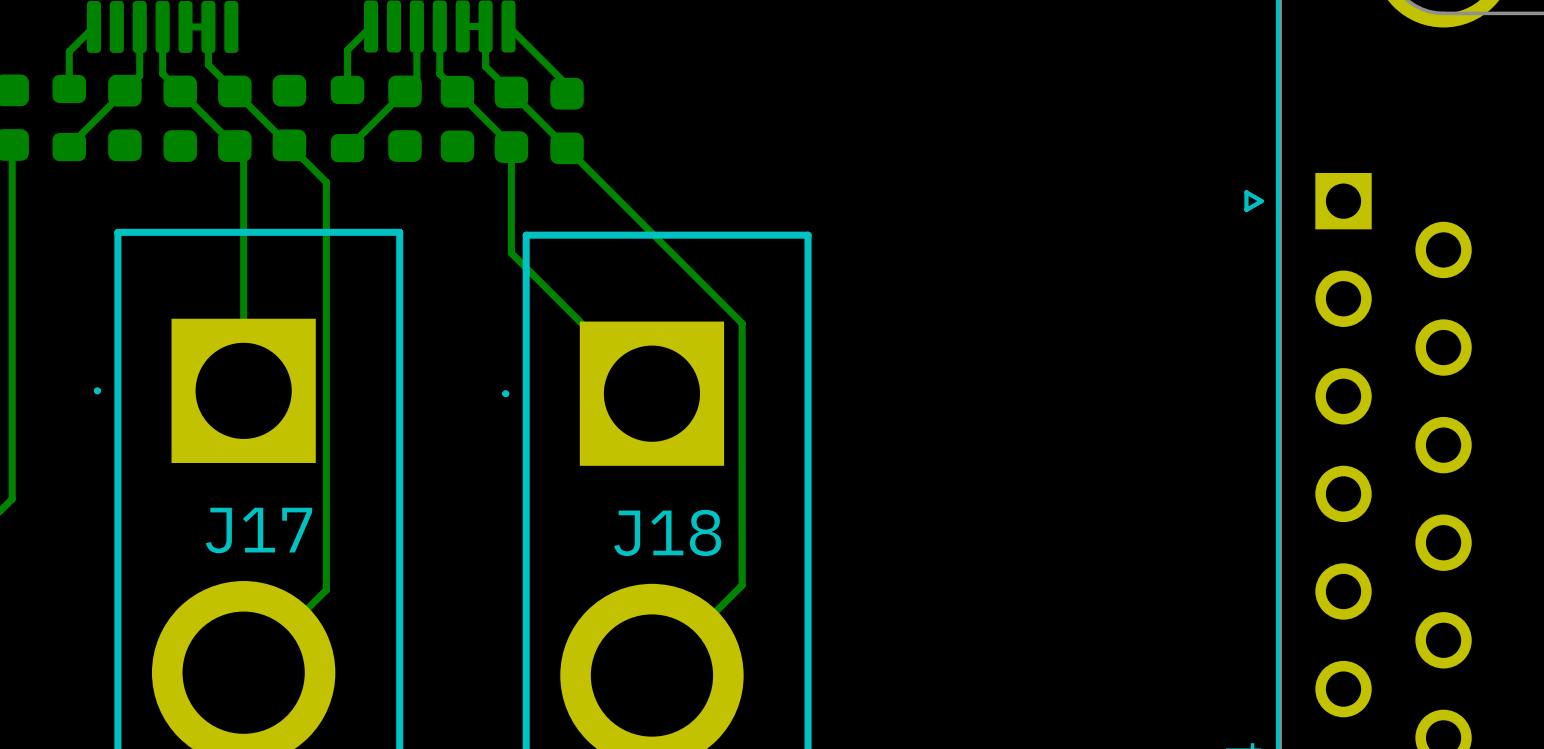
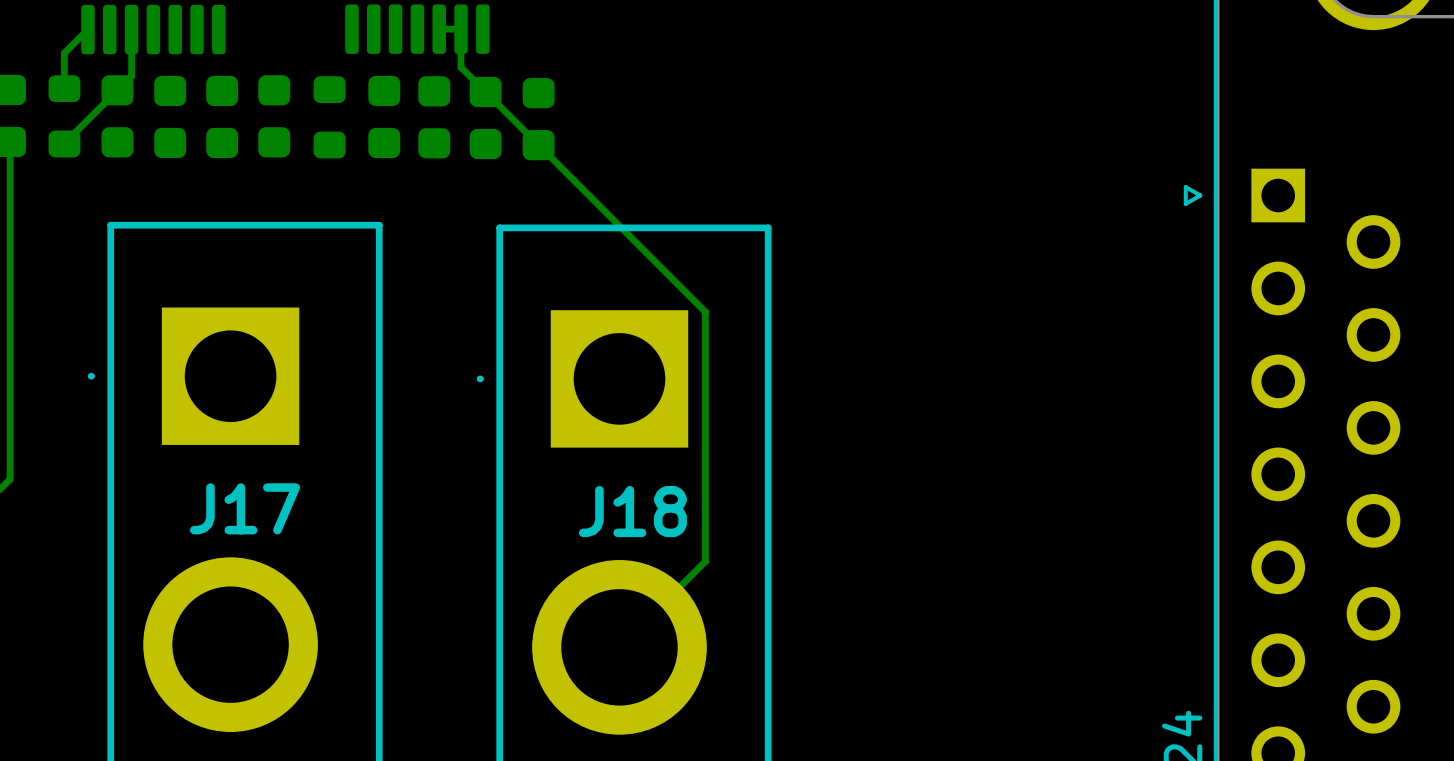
bottom track: (162, 26) (162, 73) (234, 146) (234, 151) (243, 160) (243, 390) -> none
bottom track: (185, 26) (208, 26) (208, 65) (288, 145) -> none
bottom track: (371, 26) (347, 50) (347, 90) -> none
bottom track: (416, 26) (416, 79) (348, 148) -> none
bottom track: (439, 26) (439, 74) (511, 145) (511, 253) (651, 393) -> none
bottom track: (508, 26) (567, 85) (567, 93) -> none
bottom track: (289, 145) (326, 182) (326, 590) (243, 672) -> none

